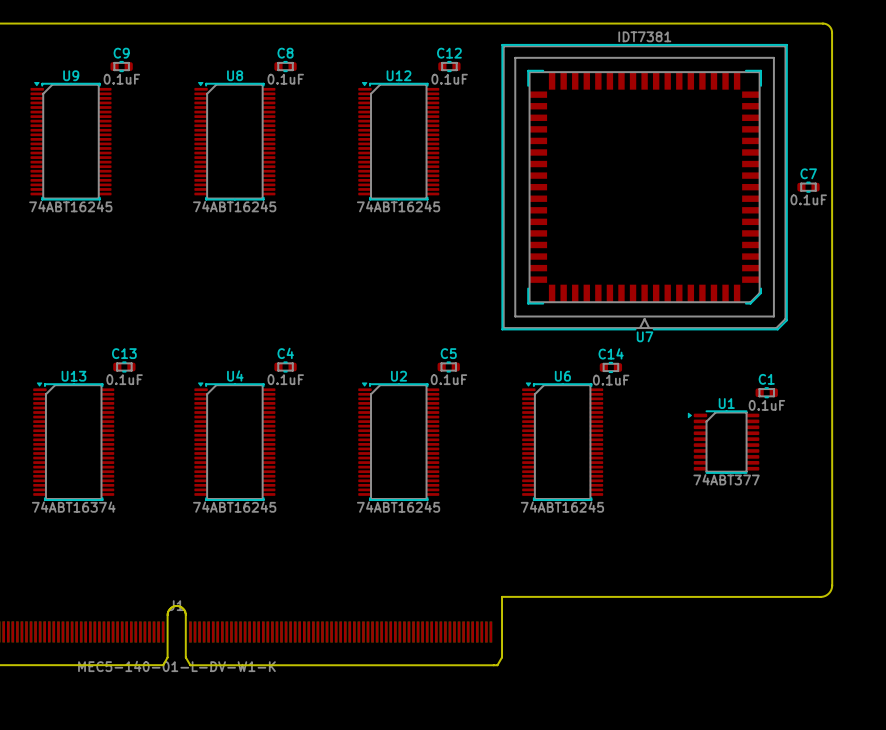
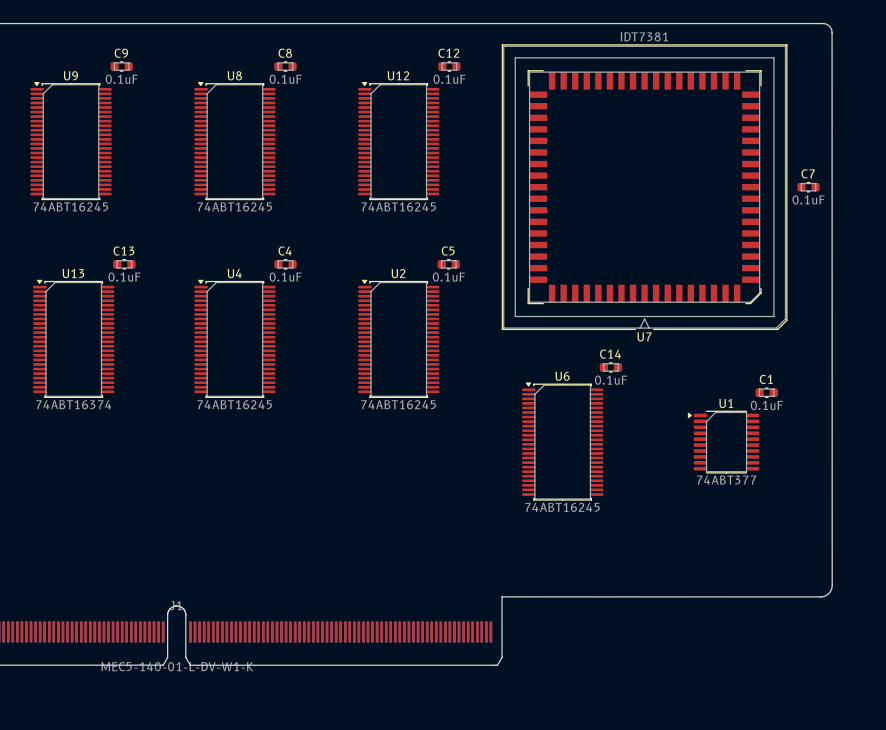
C13 position: (124, 366) -> (124, 264)
C4 position: (285, 366) -> (285, 264)
C5 position: (448, 366) -> (448, 264)
U13 position: (73, 441) -> (73, 338)
U4 position: (234, 441) -> (234, 338)
U2 position: (398, 441) -> (398, 338)

